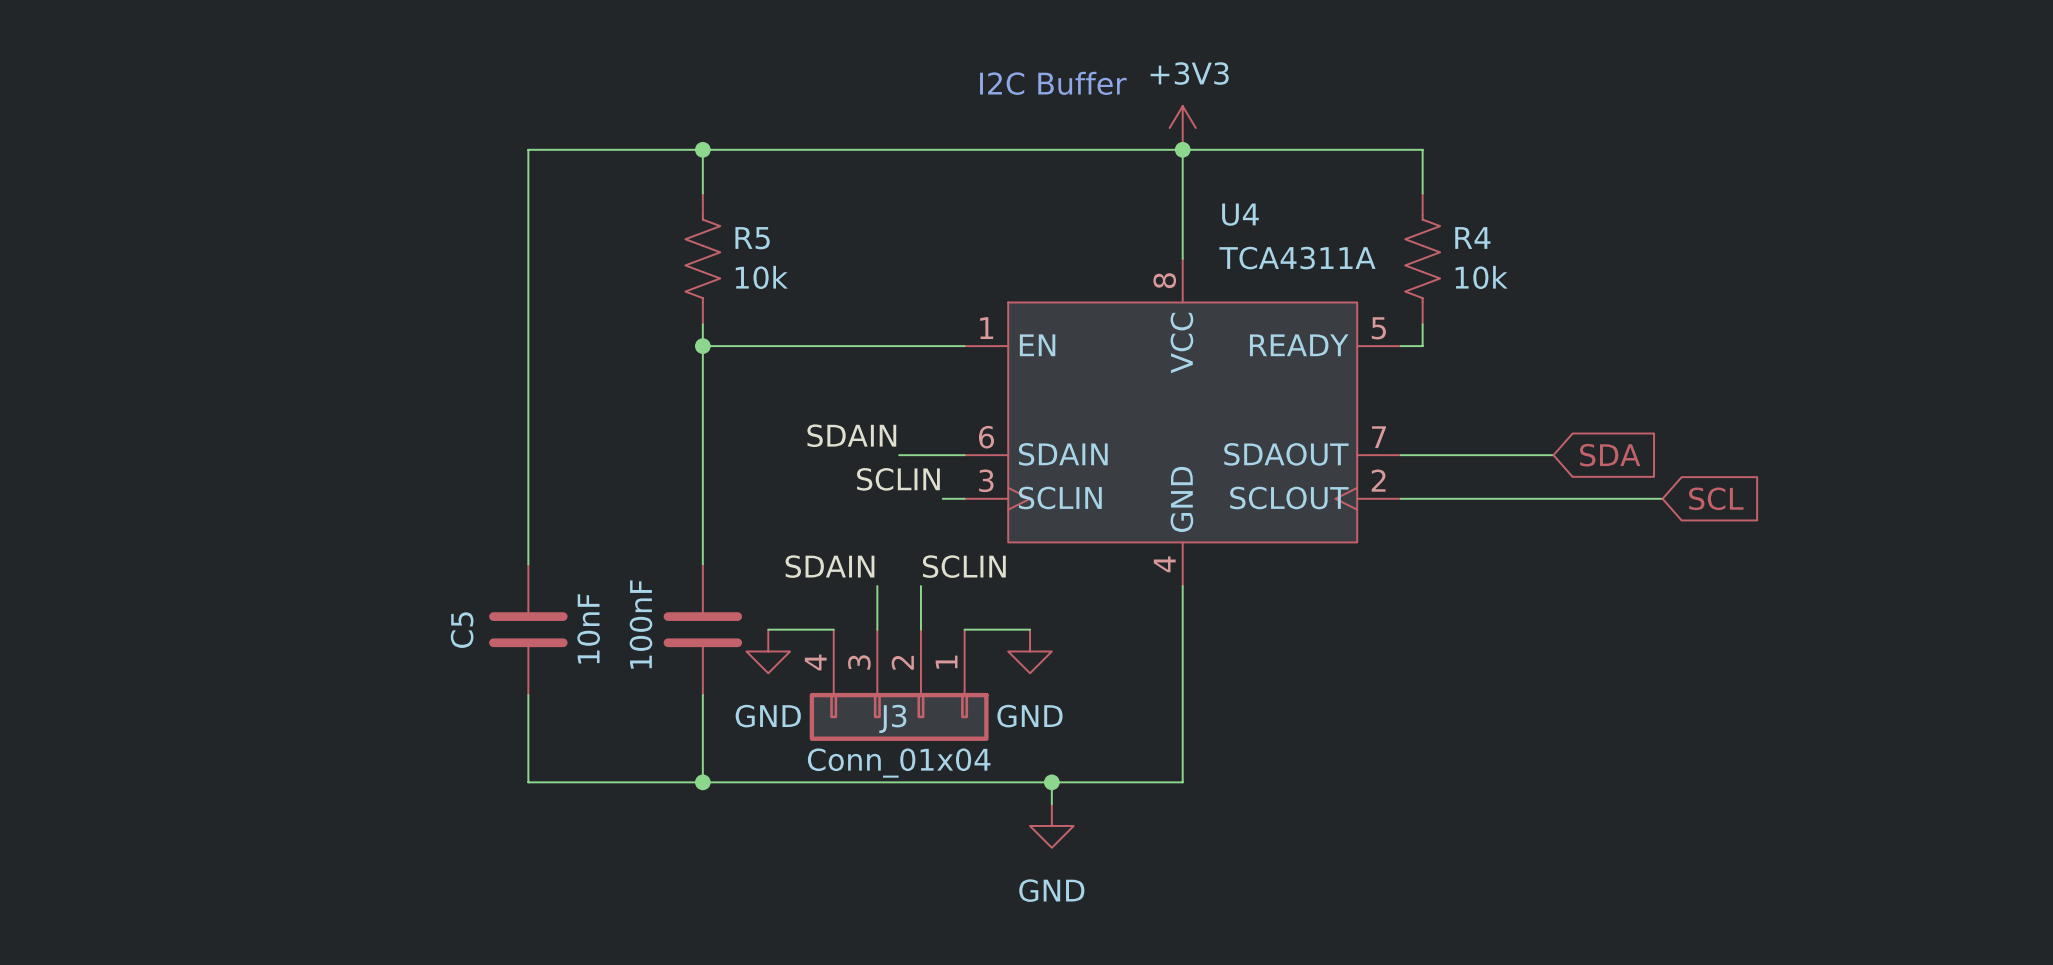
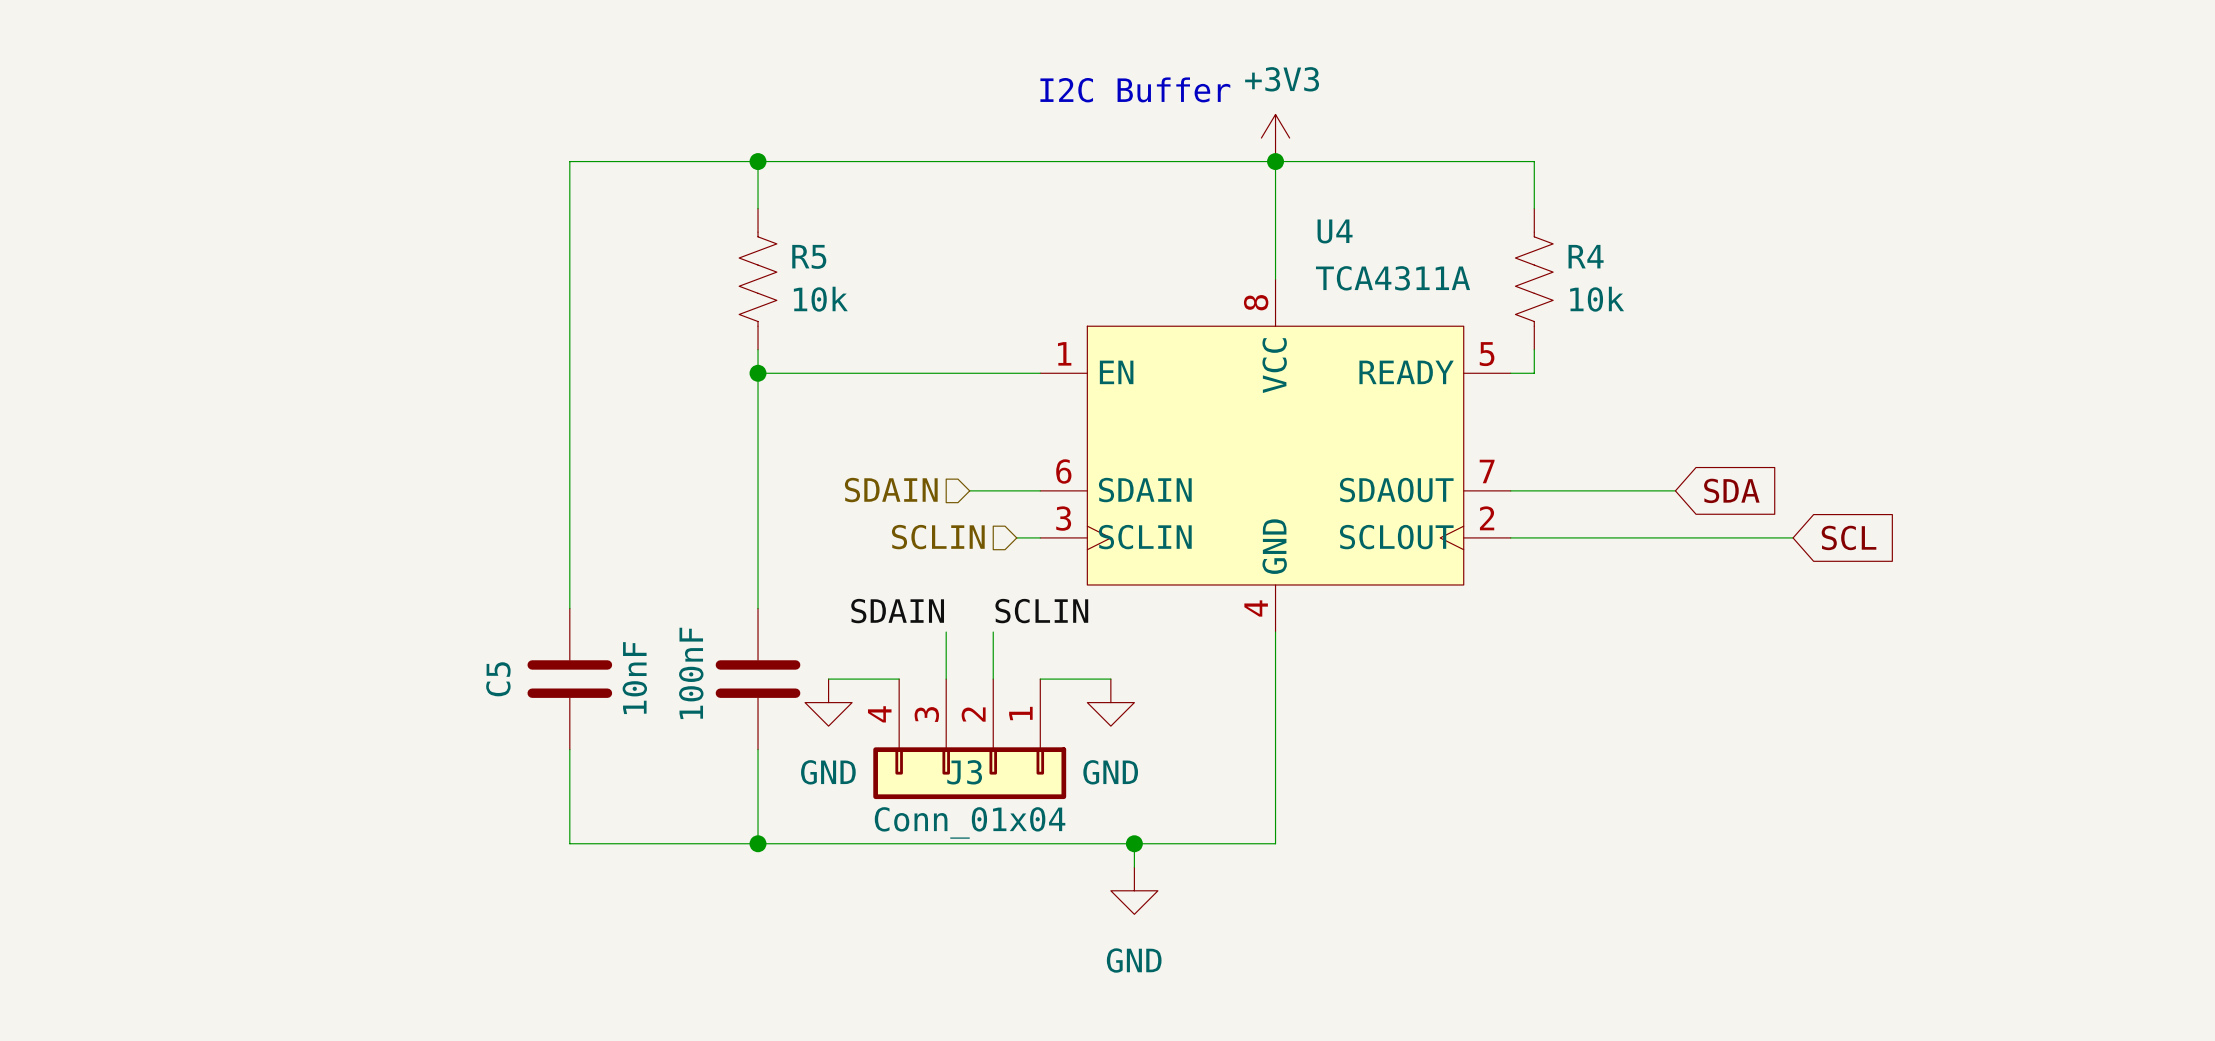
label: SDAIN (851, 435) -> none
hierarchical label: none -> SDAIN (891, 490)
label: SCLIN (898, 479) -> none
hierarchical label: none -> SCLIN (938, 537)

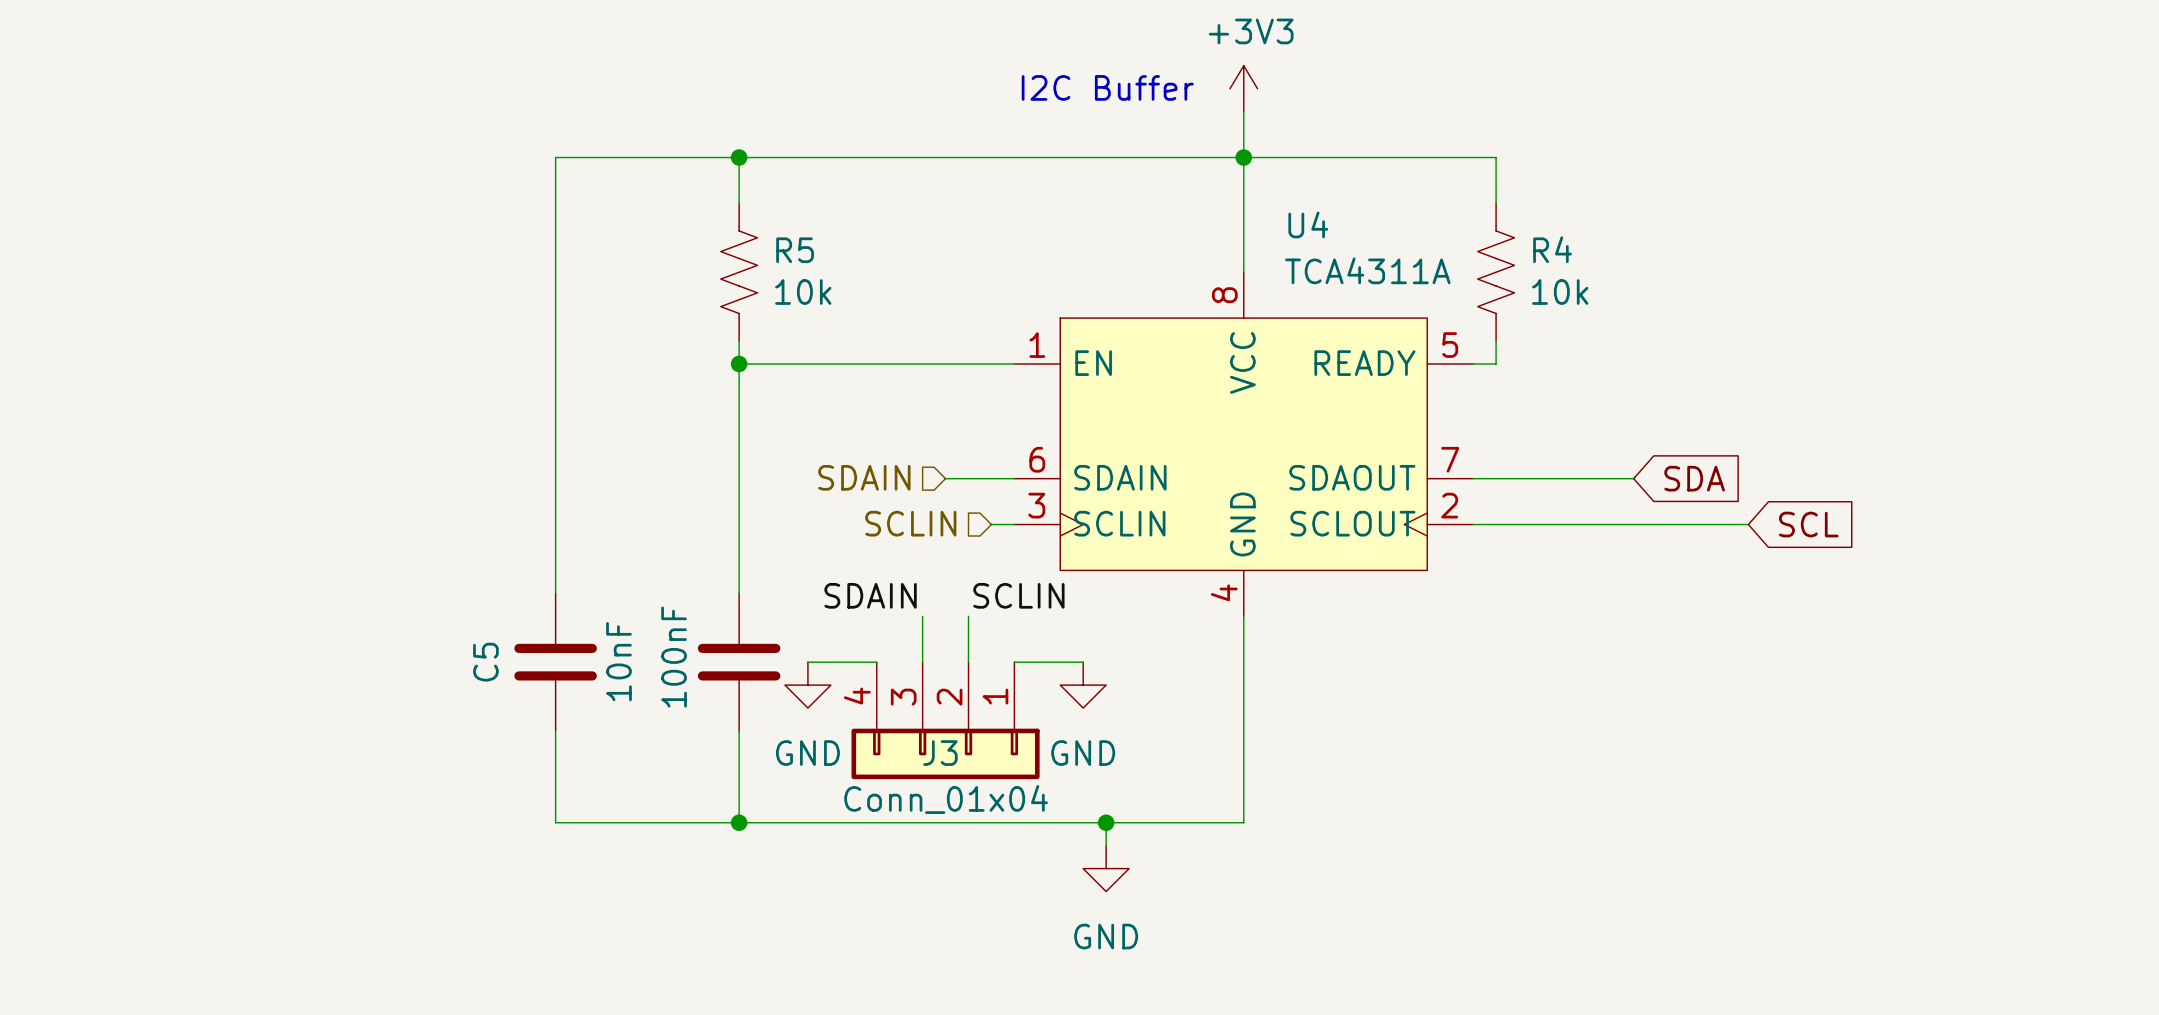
power symbol position: +3V3 (1275, 138) -> +3V3 (1243, 88)

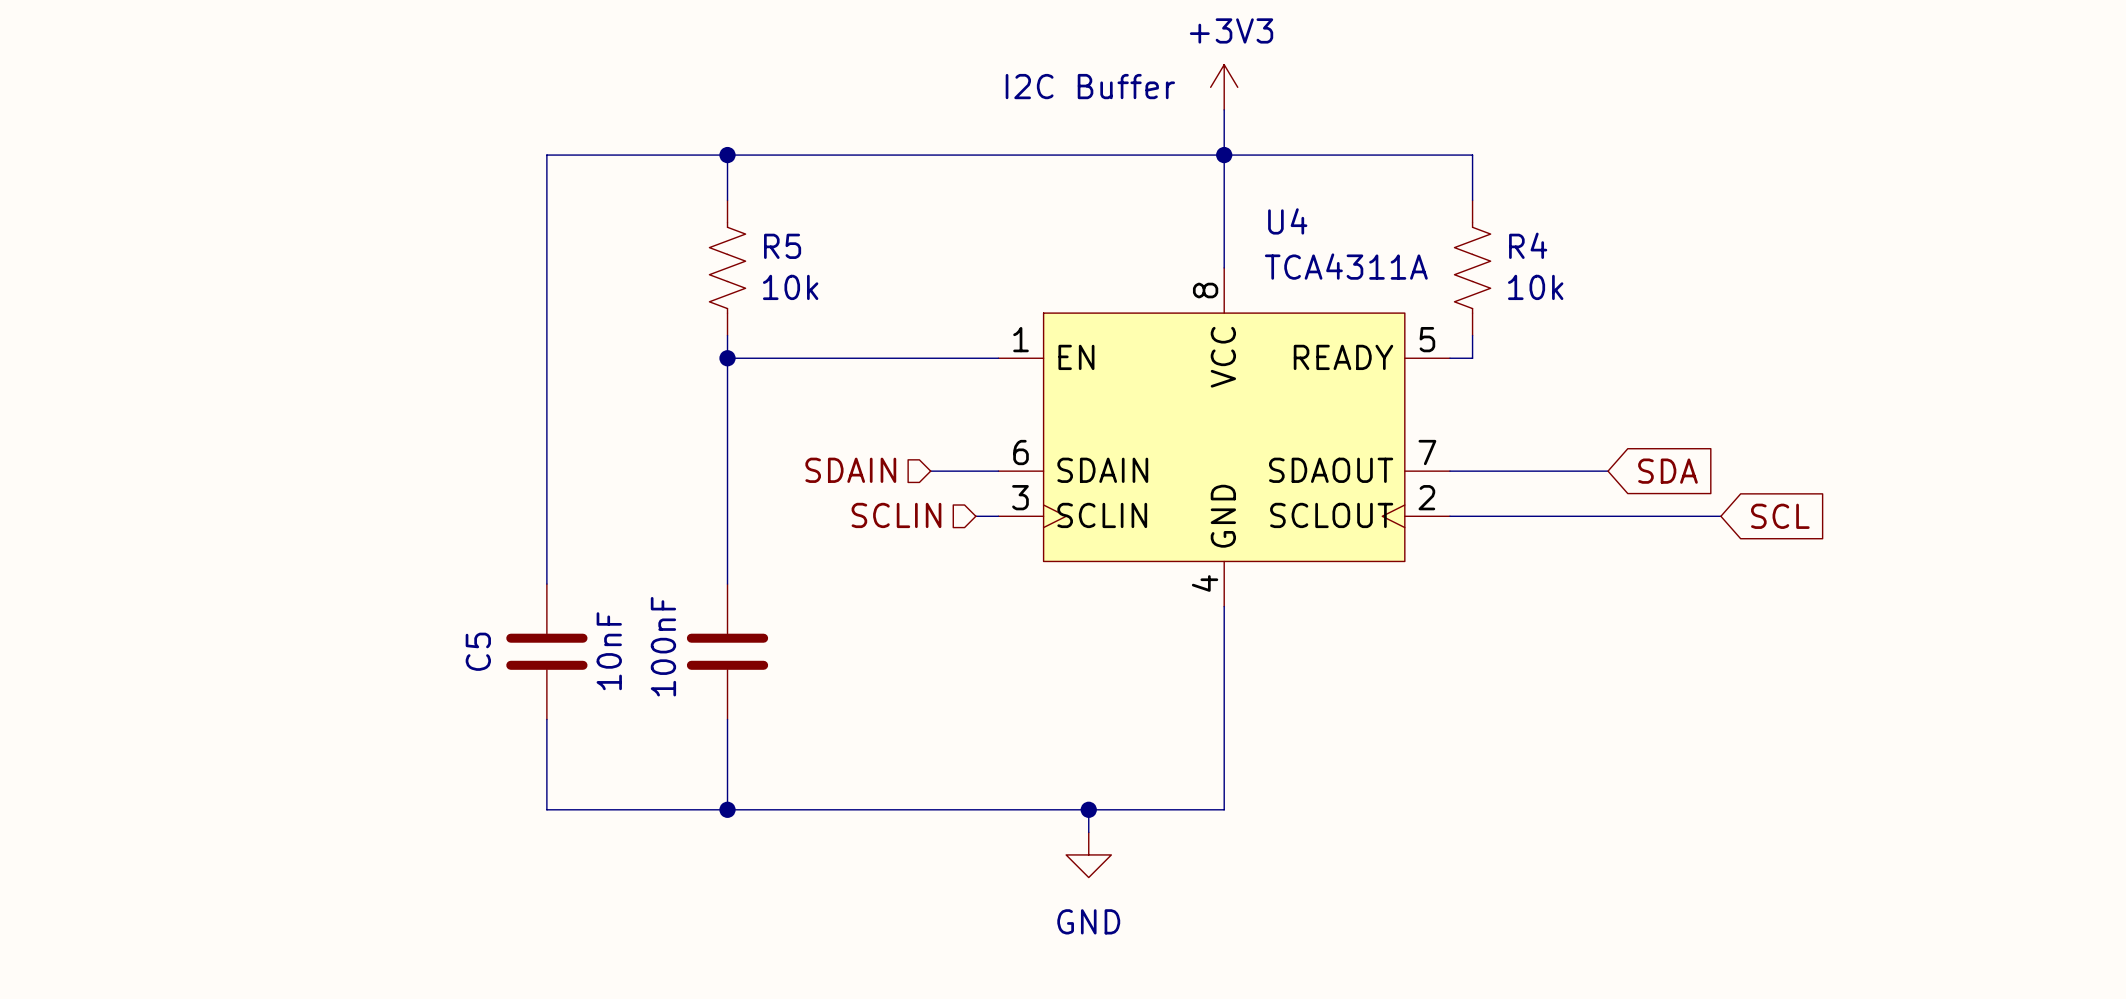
label: SDAIN (870, 595) -> none
label: SCLIN (1018, 595) -> none
wire: (922, 616) (922, 662) -> none
wire: (968, 616) (968, 662) -> none
wire: (807, 662) (876, 662) -> none
wire: (1014, 662) (1083, 662) -> none
power symbol: GND (807, 685) -> none
power symbol: GND (1083, 685) -> none
J3: Conn_01x04 (945, 720) -> none

